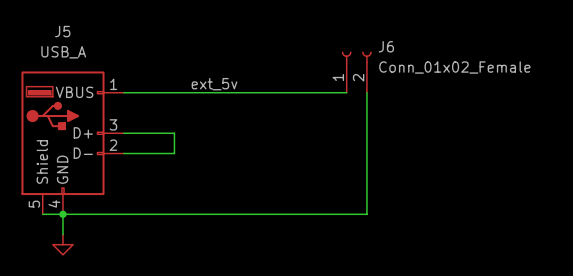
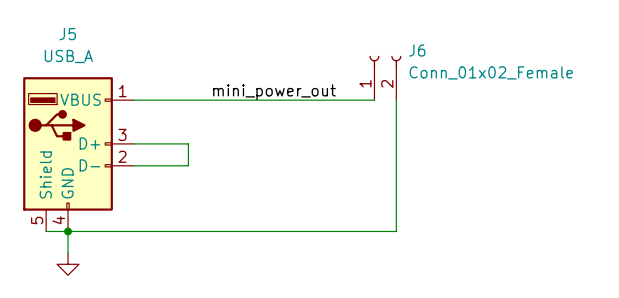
label: ext_5v (214, 84) -> mini_power_out (274, 92)

